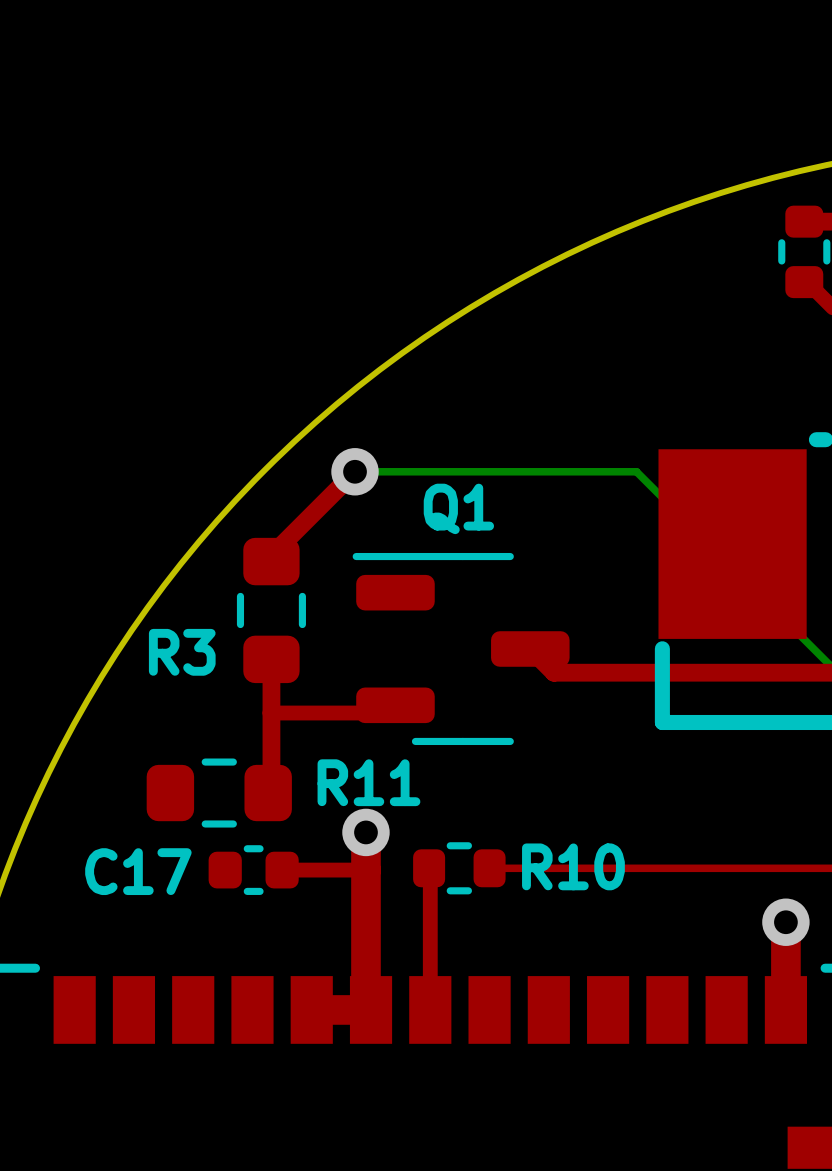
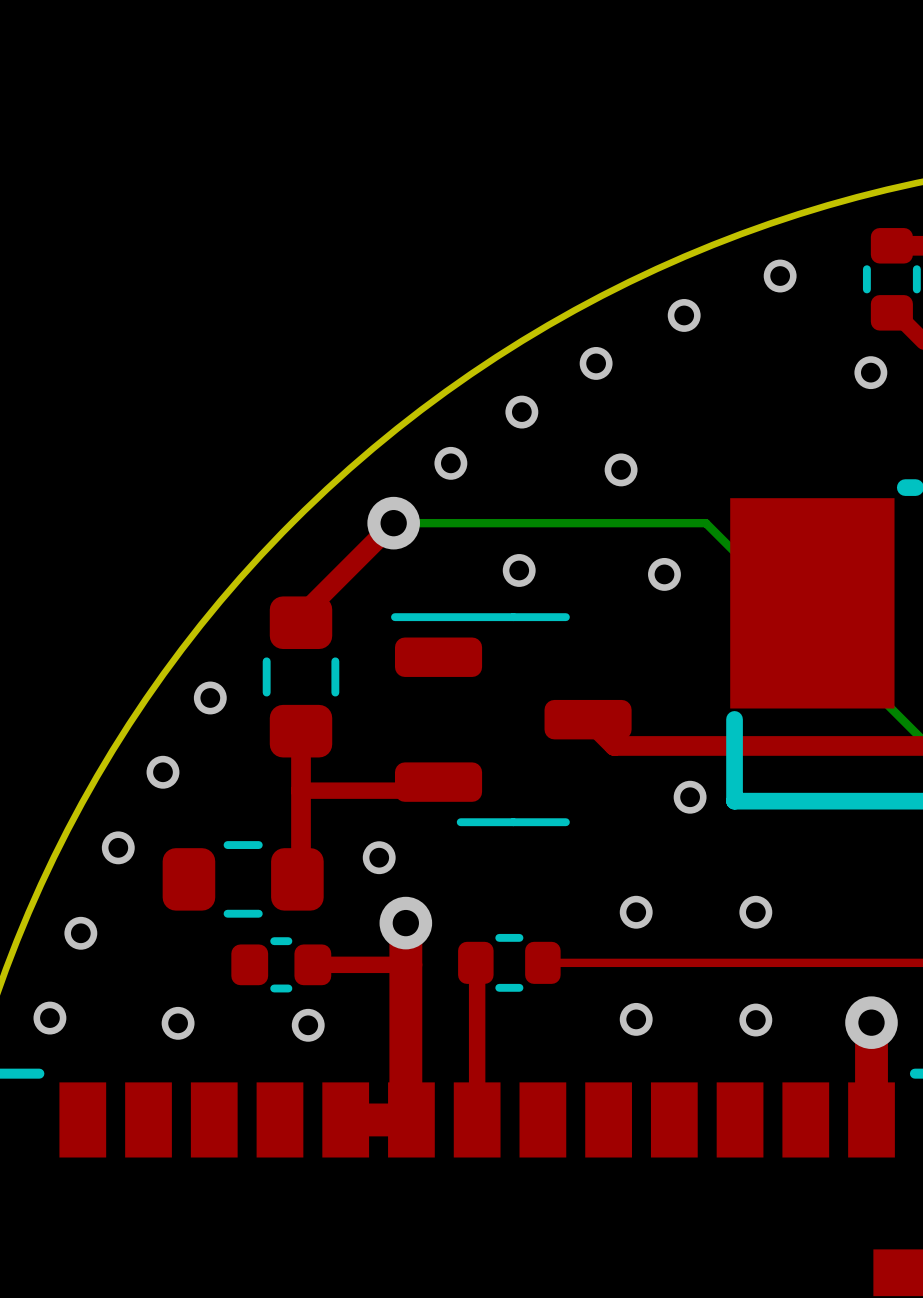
via: none -> (780, 276)
via: none -> (684, 315)
via: none -> (596, 363)
via: none -> (870, 372)
via: none -> (521, 412)
via: none -> (450, 463)
via: none -> (621, 469)
Q1 name: Q1 (458, 508) -> none
via: none -> (519, 570)
via: none -> (664, 574)
via: none -> (210, 697)
R3 name: R3 (182, 652) -> none
via: none -> (162, 772)
via: none -> (690, 797)
via: none -> (118, 847)
via: none -> (379, 857)
R11 name: R11 (368, 782) -> none
via: none -> (636, 912)
via: none -> (755, 912)
via: none -> (80, 933)
R10 name: R10 (573, 866) -> none
C17 name: C17 (138, 871) -> none
via: none -> (49, 1018)
via: none -> (636, 1019)
via: none -> (755, 1020)
via: none -> (178, 1023)
via: none -> (308, 1025)

